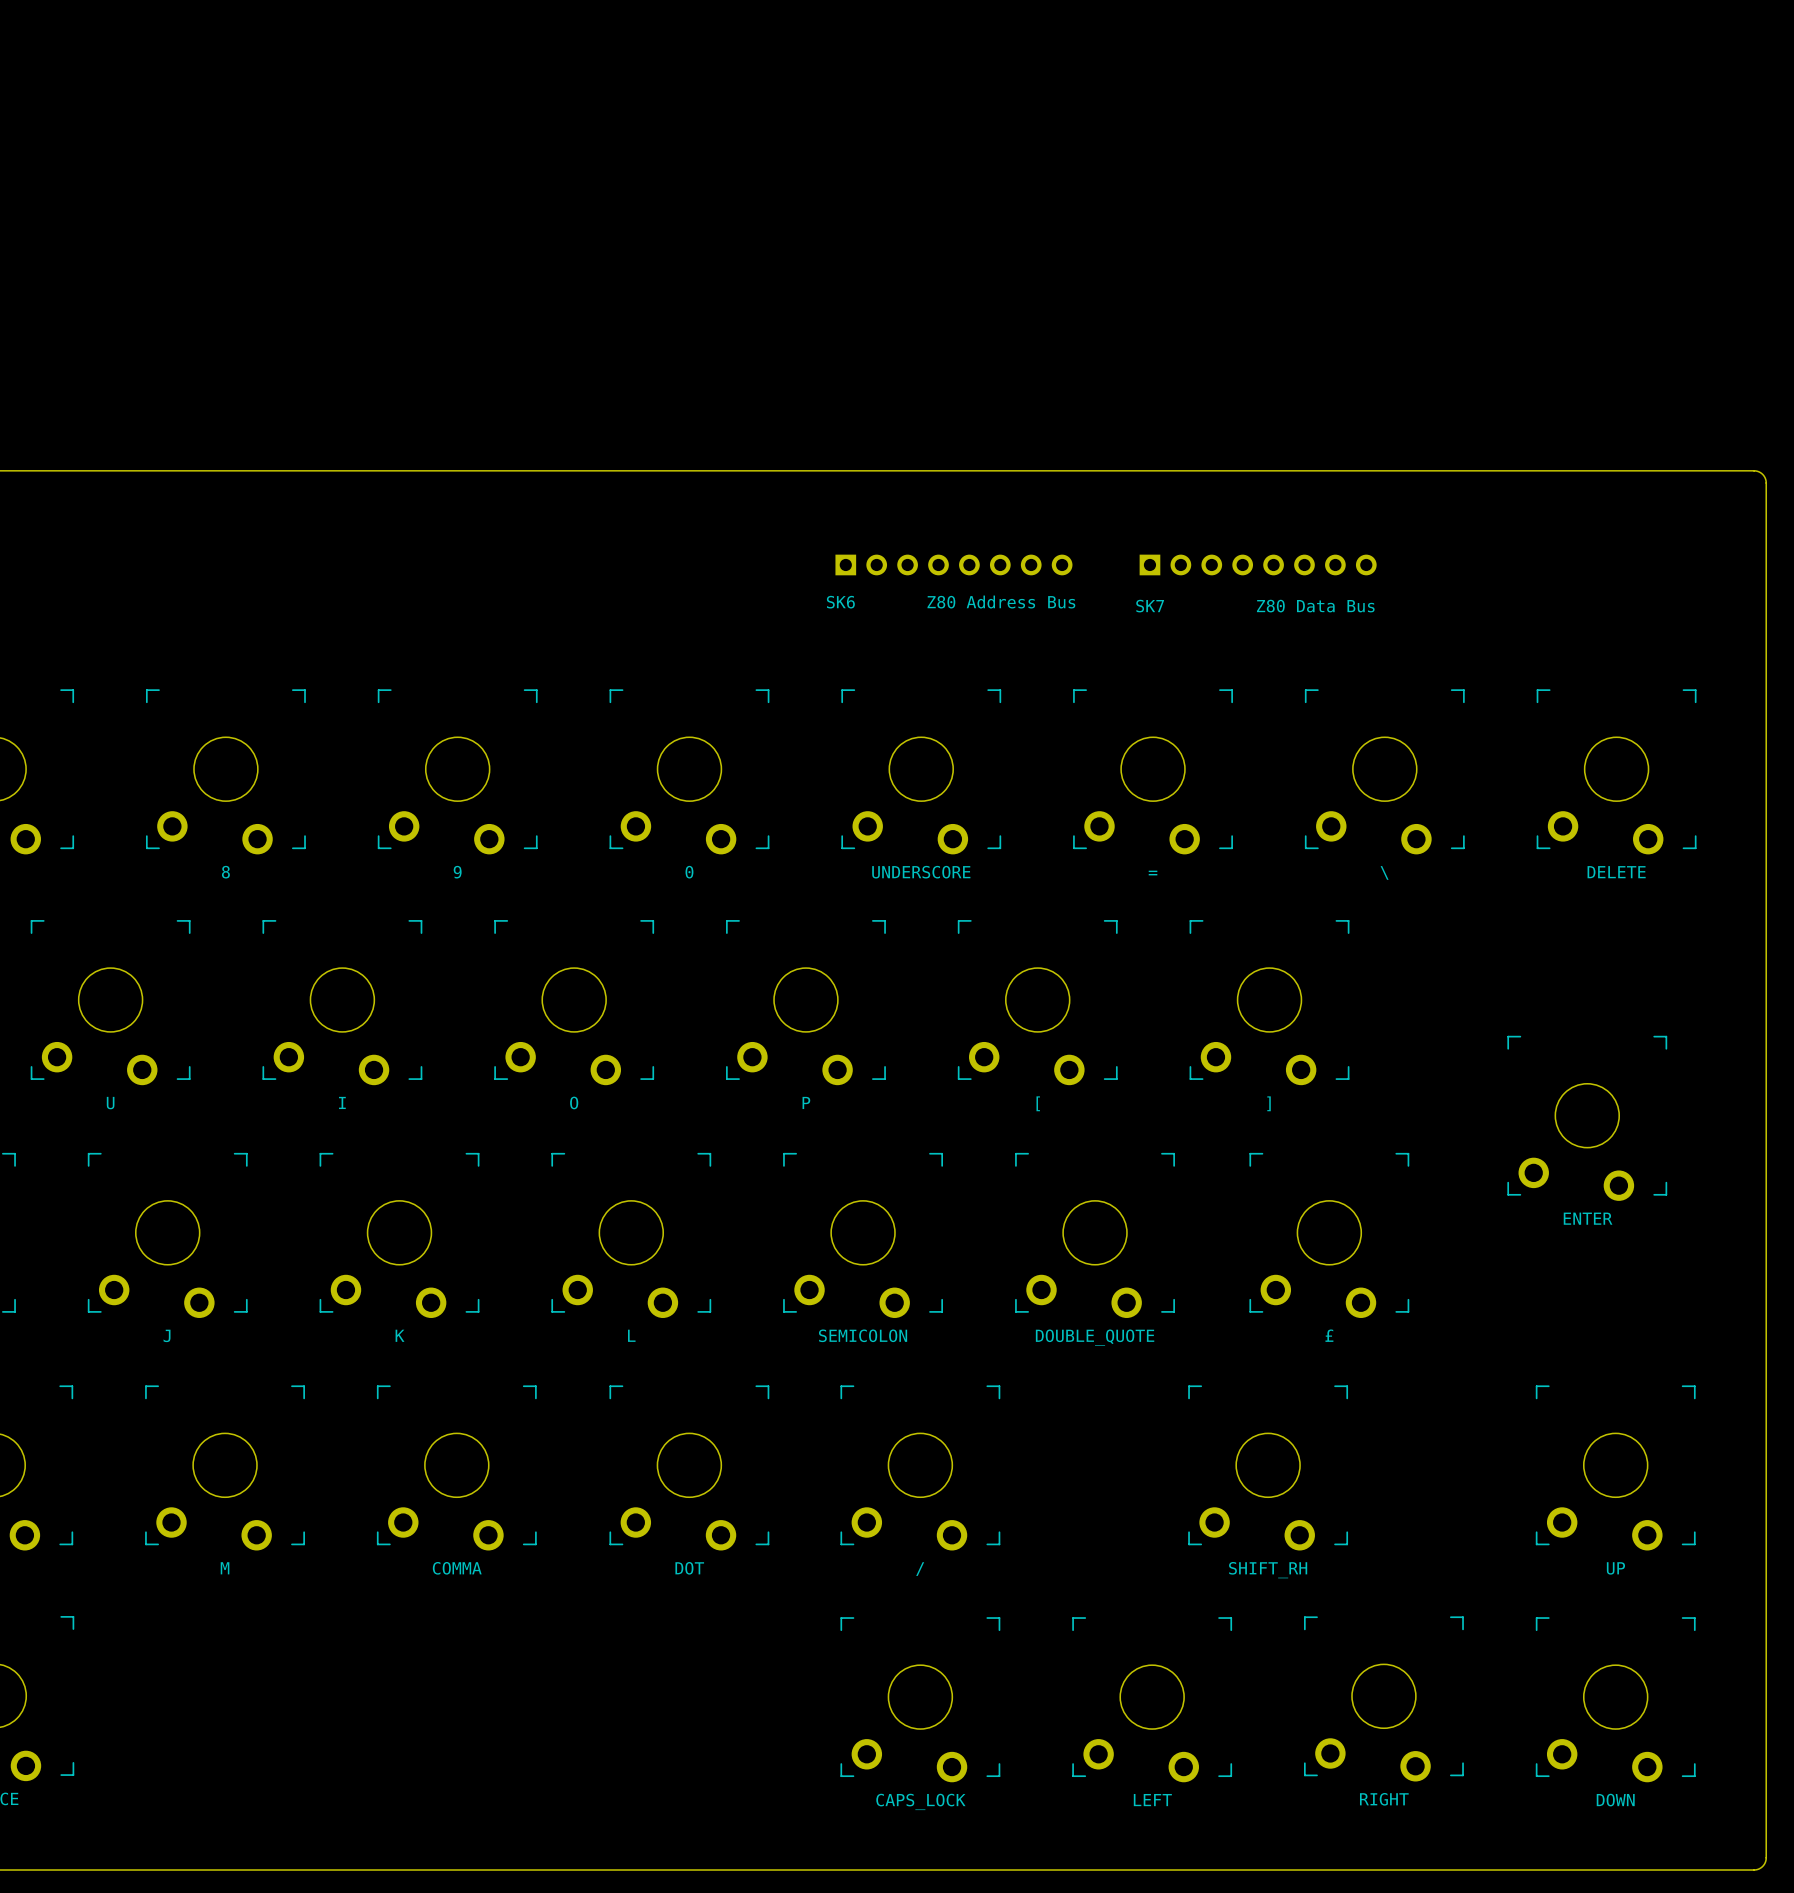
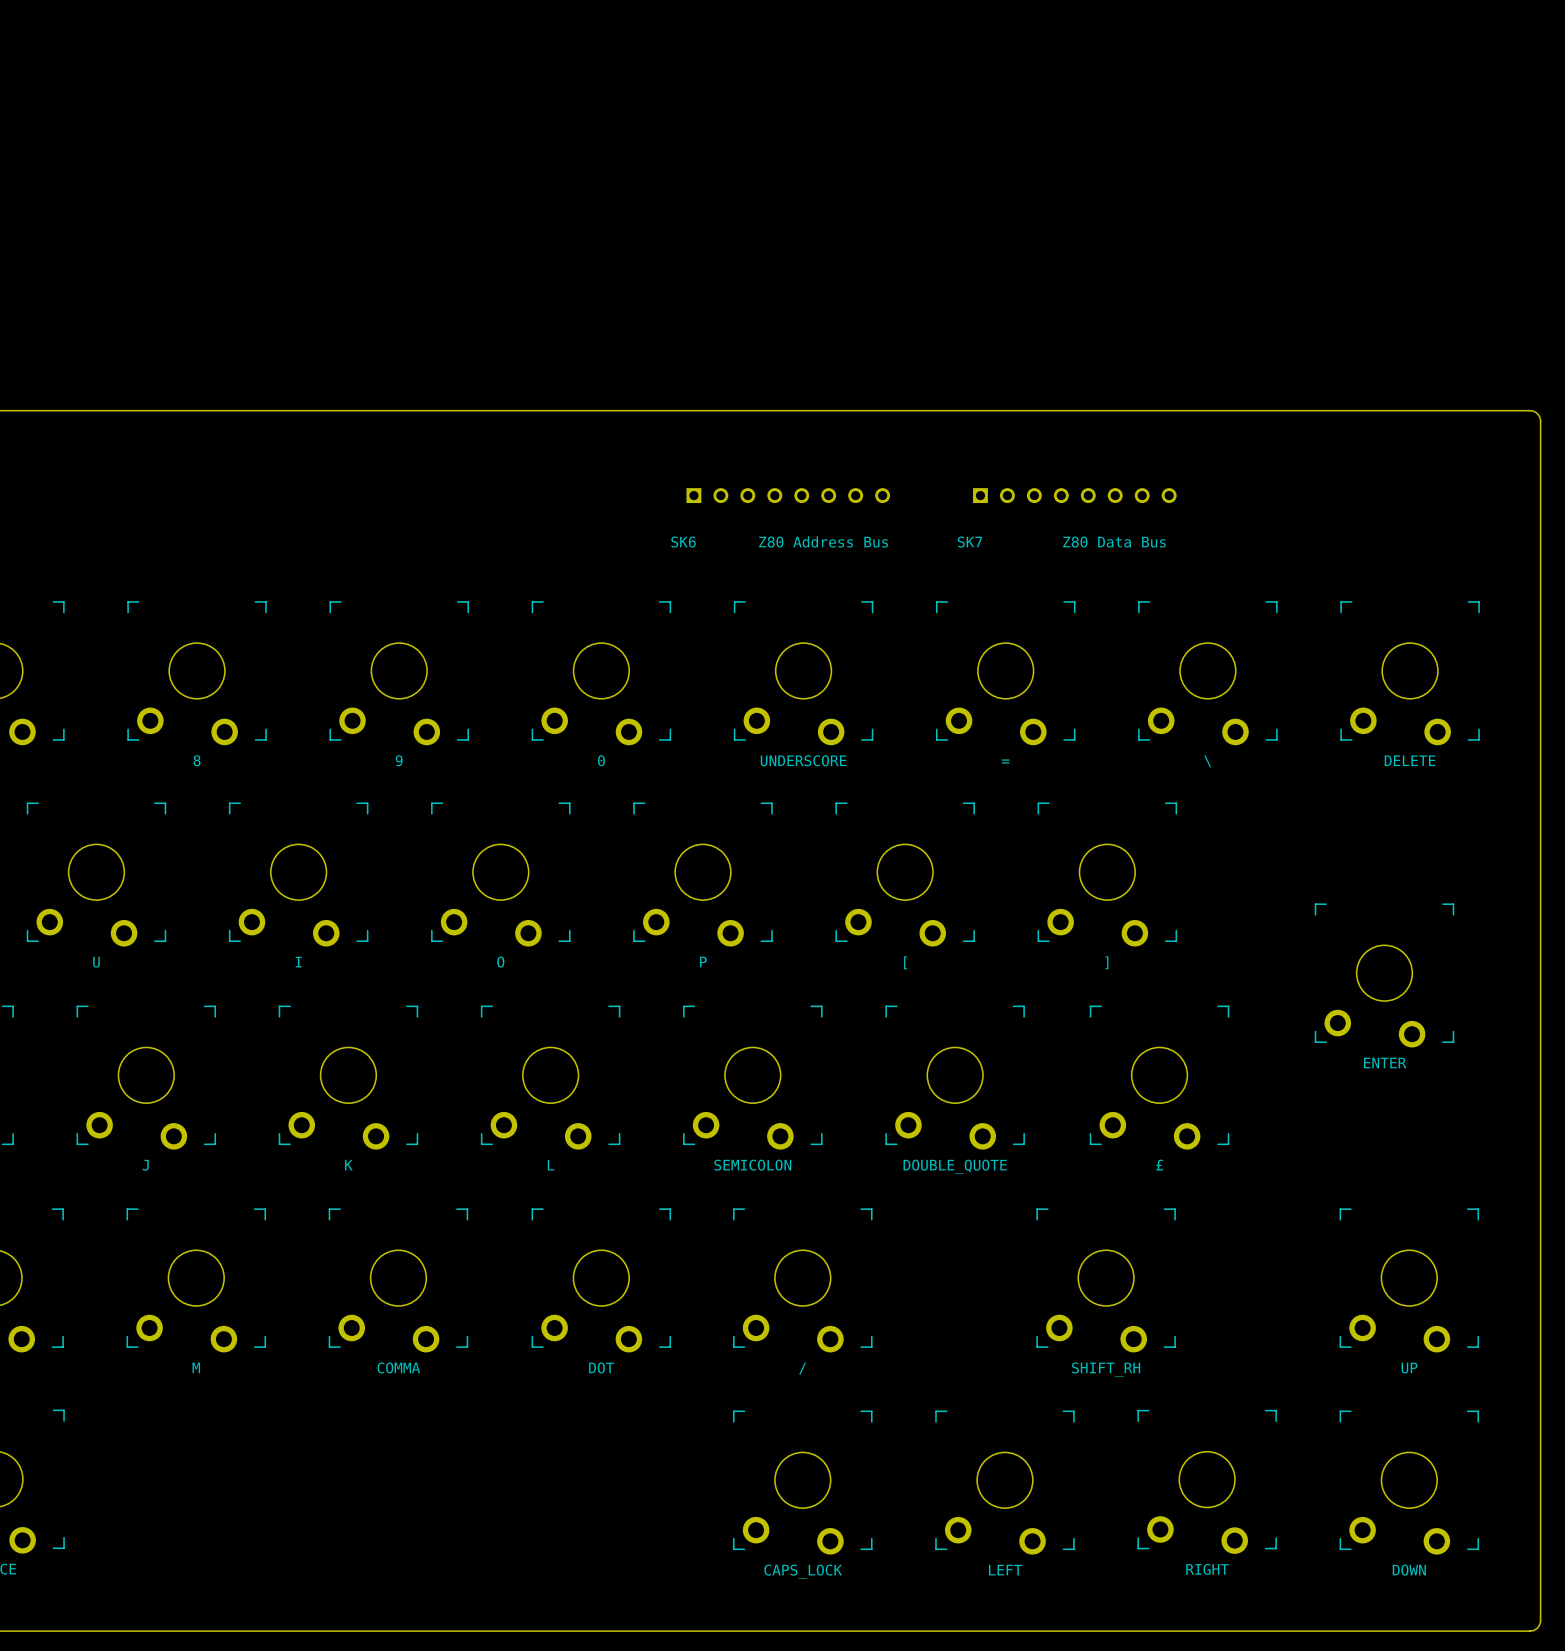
part: (953, 564) -> none
part: (1258, 564) -> none
part: none -> (788, 495)
part: none -> (1074, 495)
text position: SK6 Z80 Address Bus (951, 602) -> SK6 Z80 Address Bus (779, 541)
text position: SK7 Z80 Data Bus (1255, 606) -> SK7 Z80 Data Bus (1061, 542)

